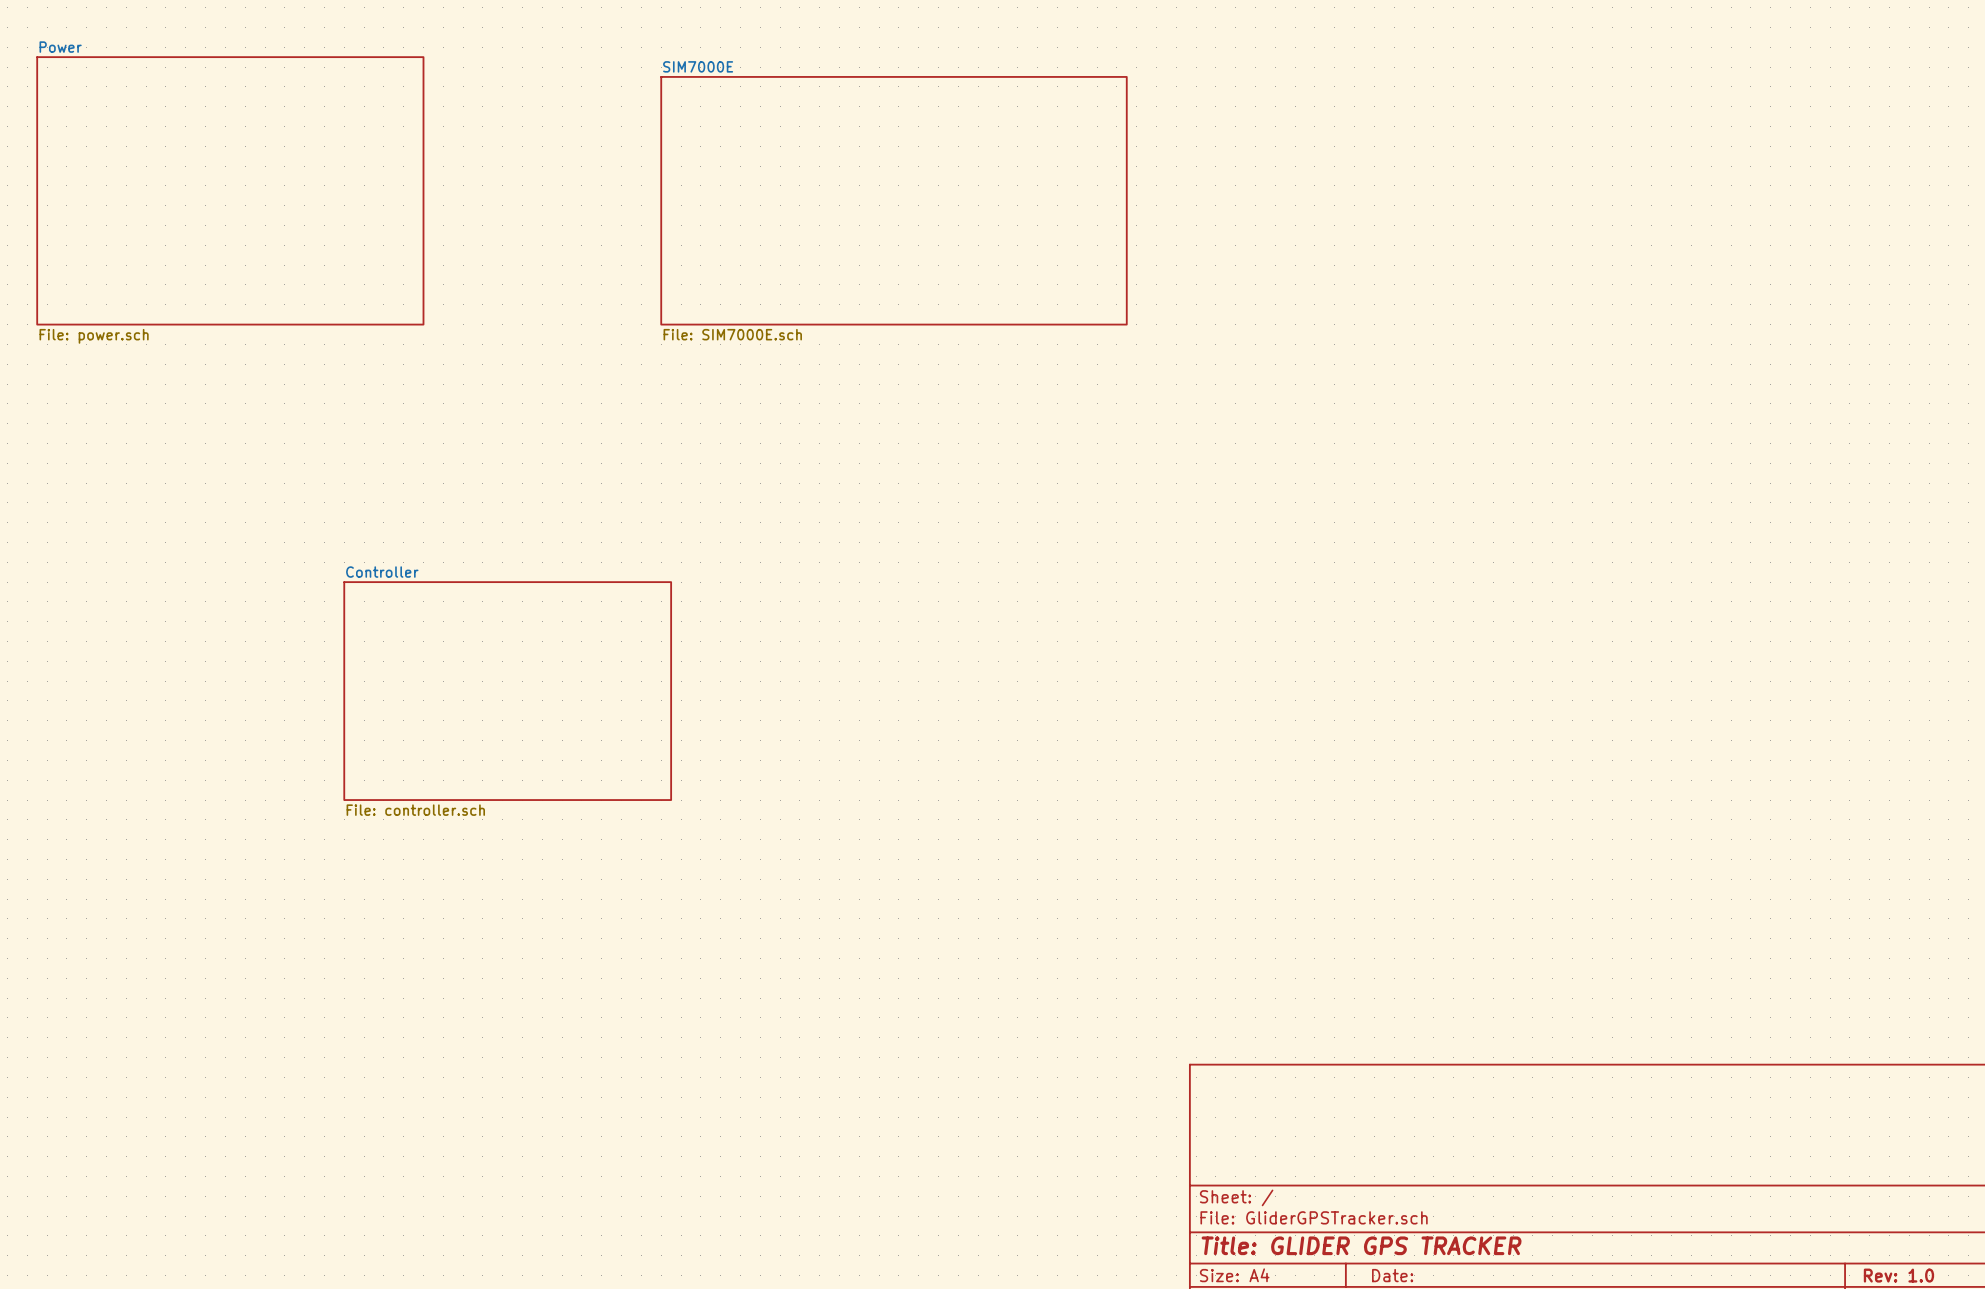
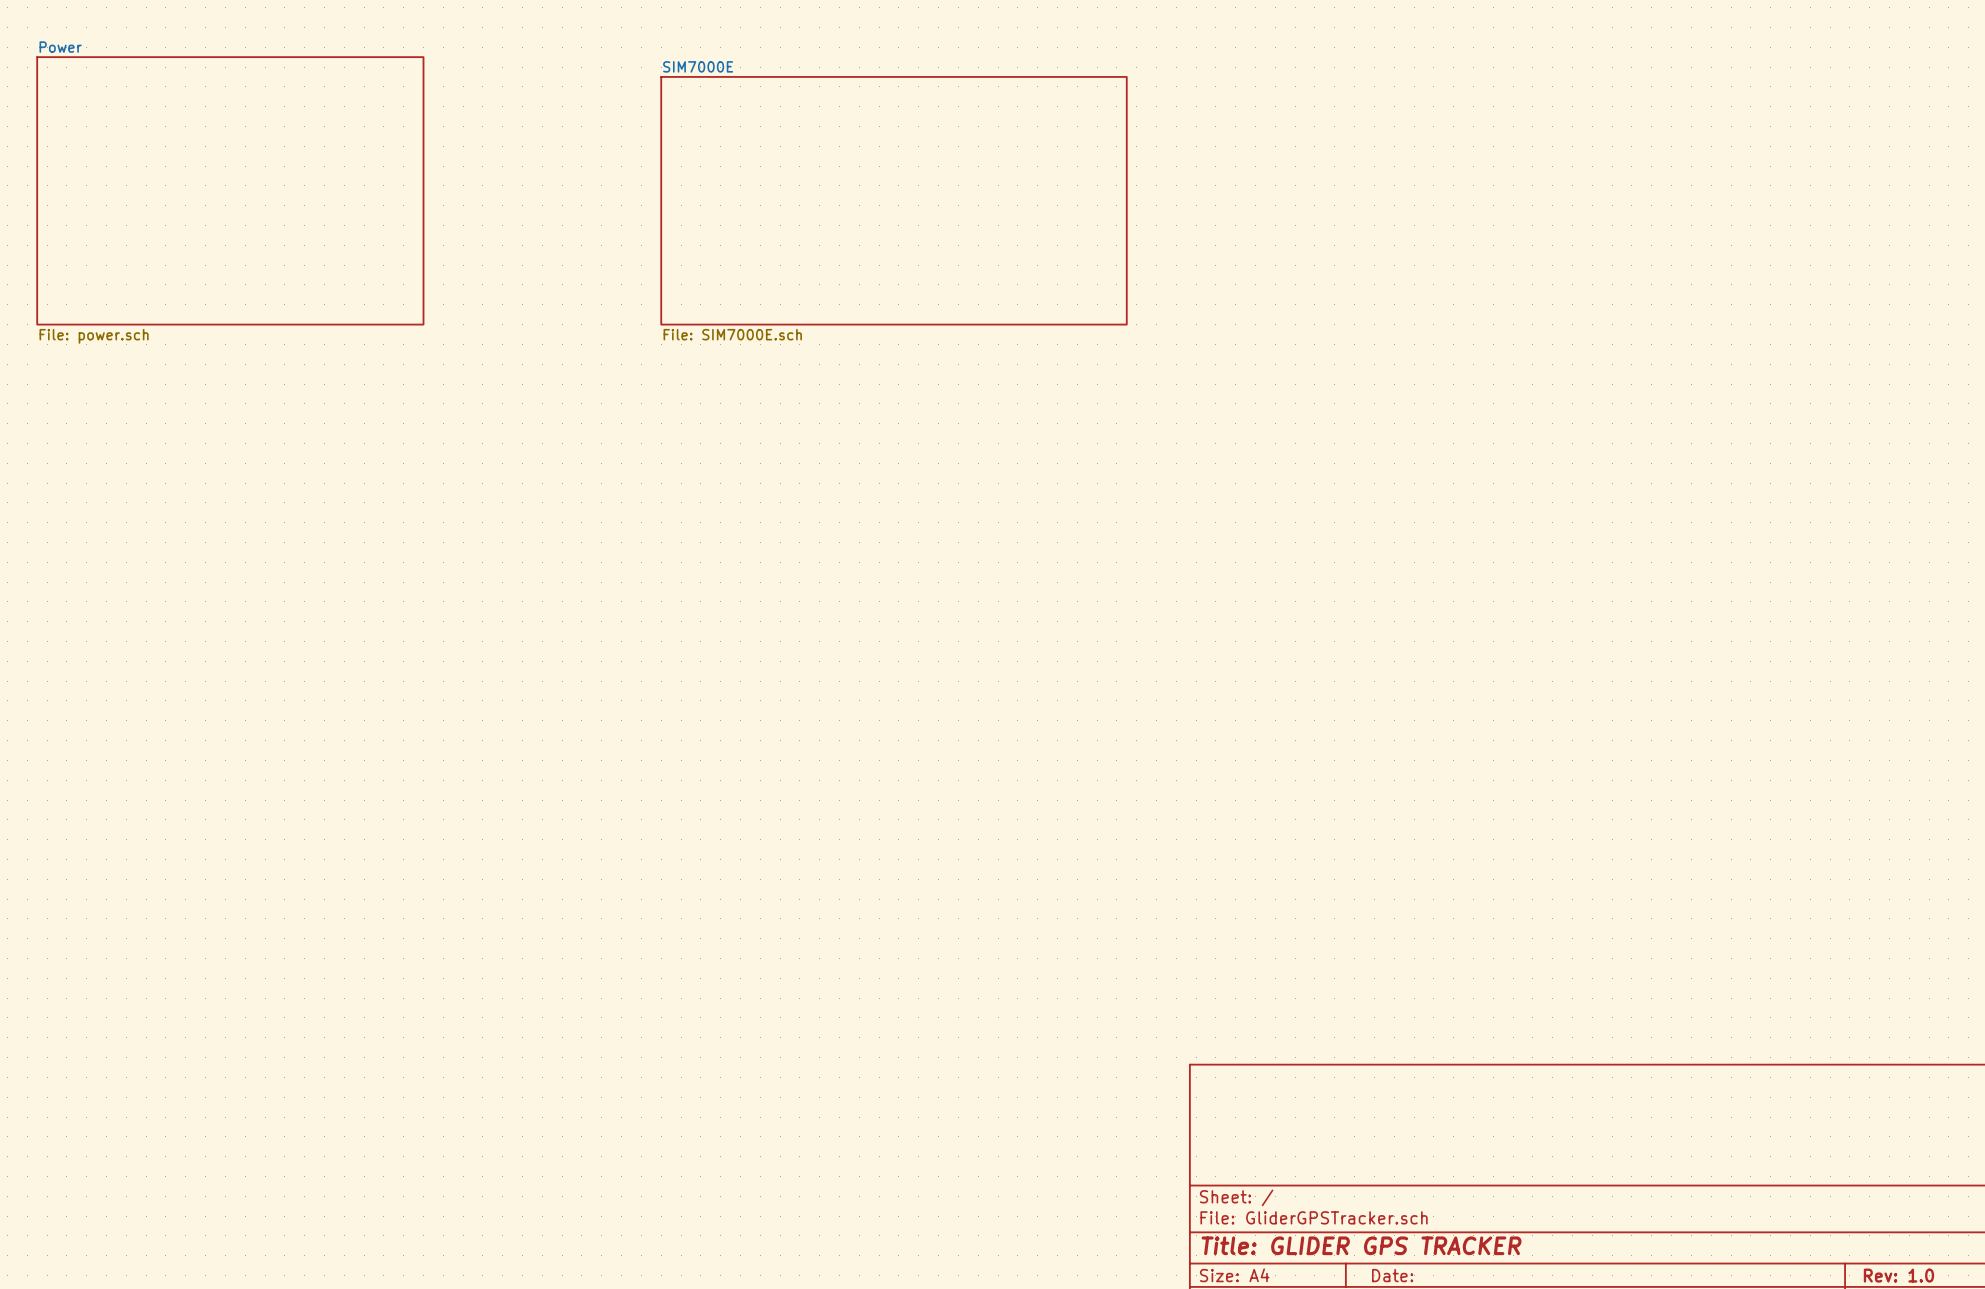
sheet Controller: File: controller.sch (507, 691) -> none

